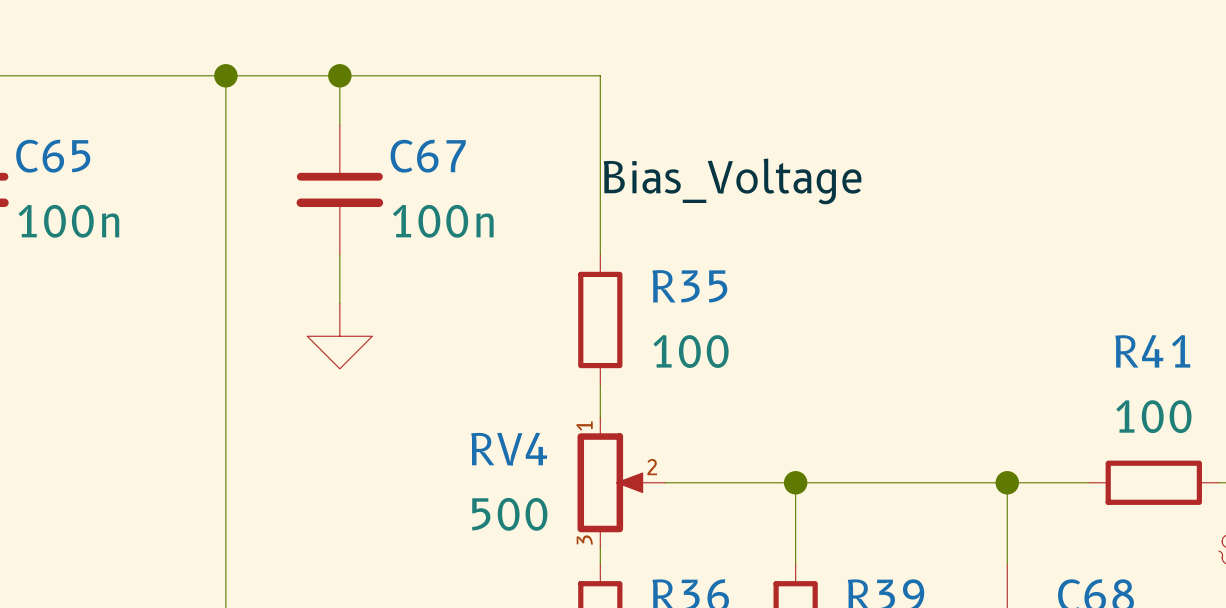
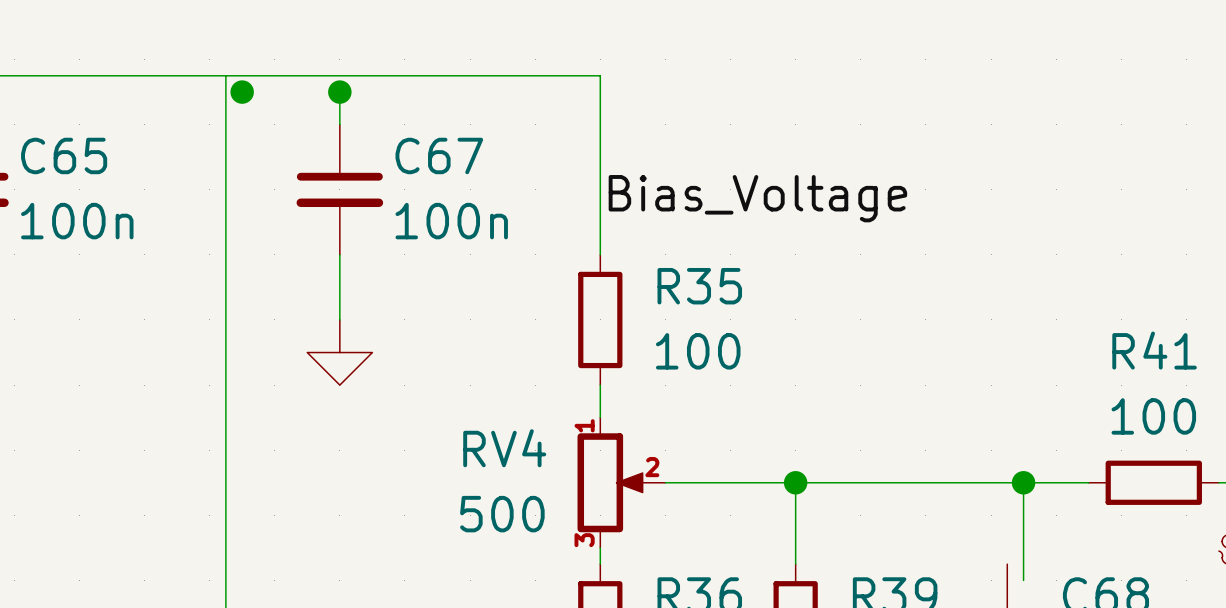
junction position: (225, 75) -> (242, 92)
junction position: (339, 75) -> (339, 92)
label position: Bias_Voltage (732, 181) -> Bias_Voltage (757, 198)
power symbol position: (339, 336) -> (339, 352)
wire: (1007, 482) (1007, 564) -> none
junction position: (1007, 482) -> (1023, 482)
wire: none -> (1023, 482) (1023, 580)

